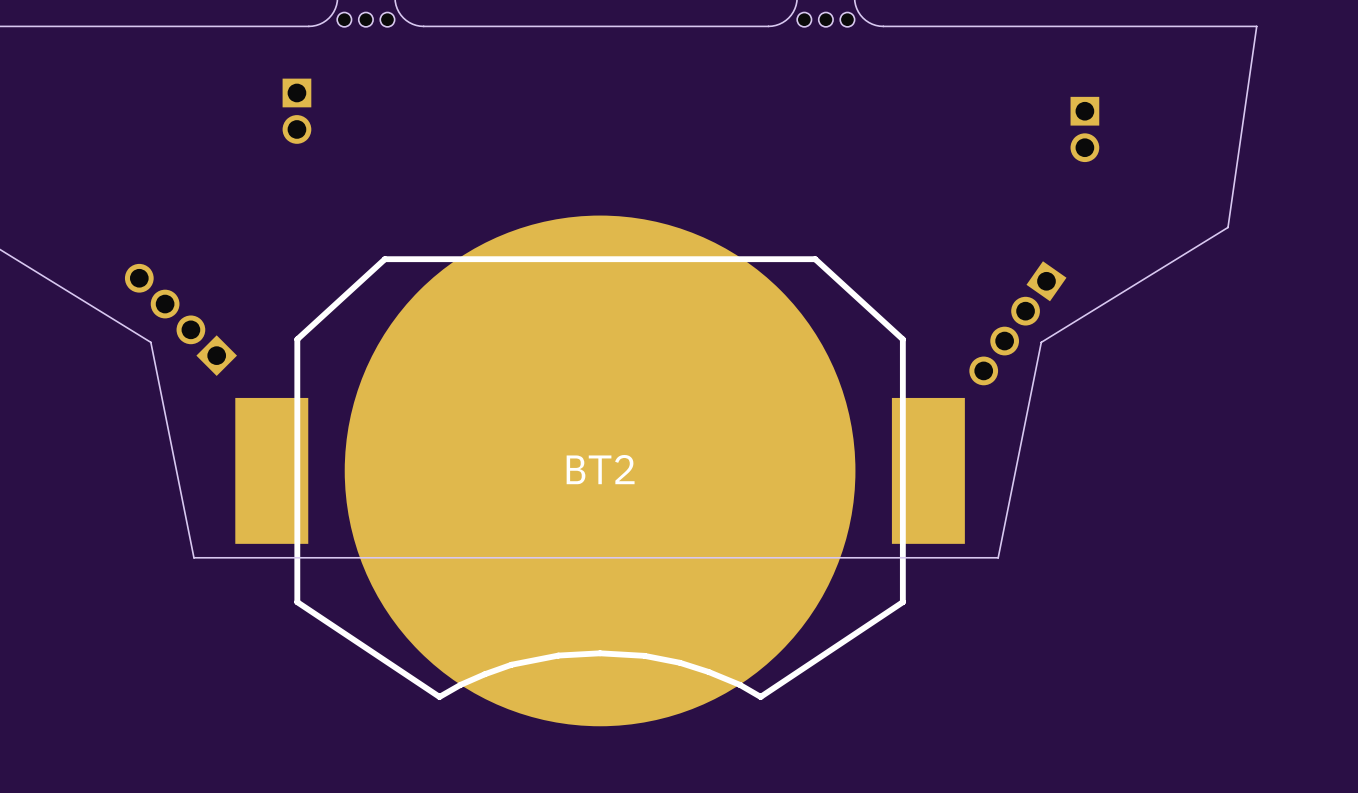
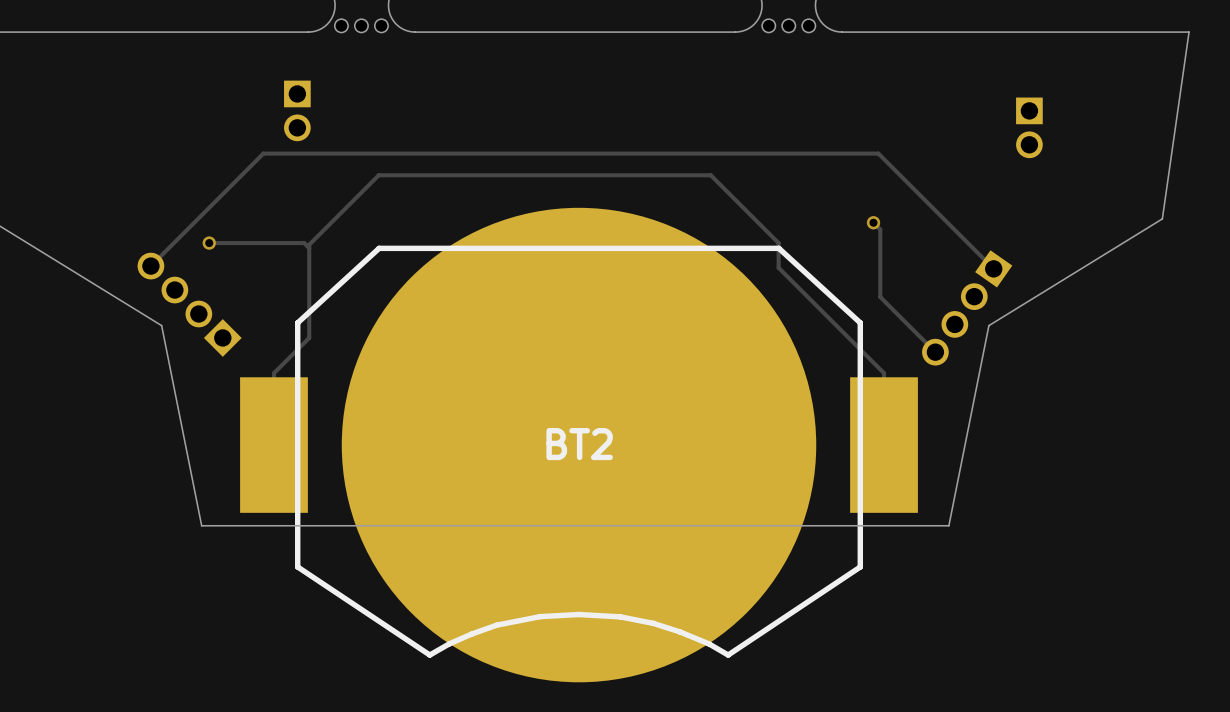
track: none -> (873, 222) (880, 229) (880, 297) (935, 352)
via: none -> (873, 222)
track: none -> (209, 243) (304, 243) (309, 248)
via: none -> (209, 243)
track: none -> (150, 266) (263, 153) (878, 153) (993, 268)
track: none -> (884, 445) (884, 373) (778, 267) (778, 243) (710, 175) (378, 175) (309, 244) (309, 337) (273, 373) (273, 445)

